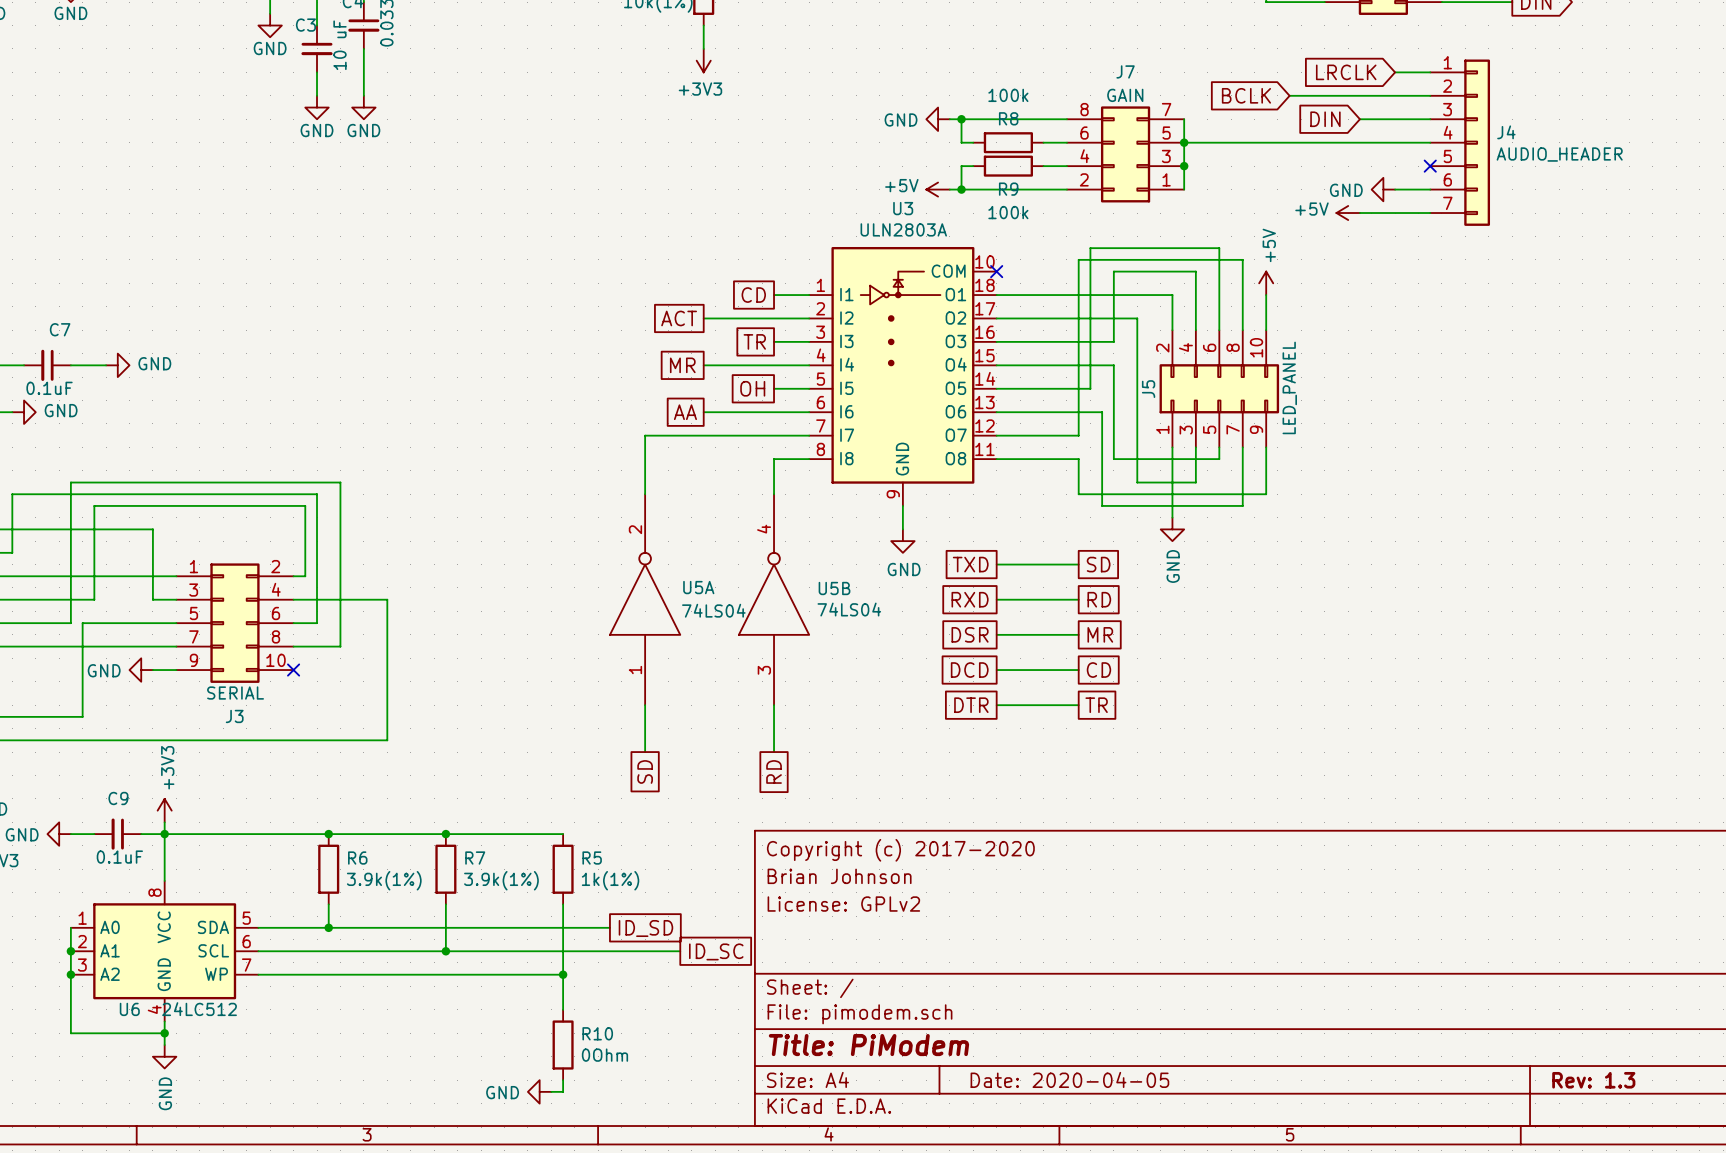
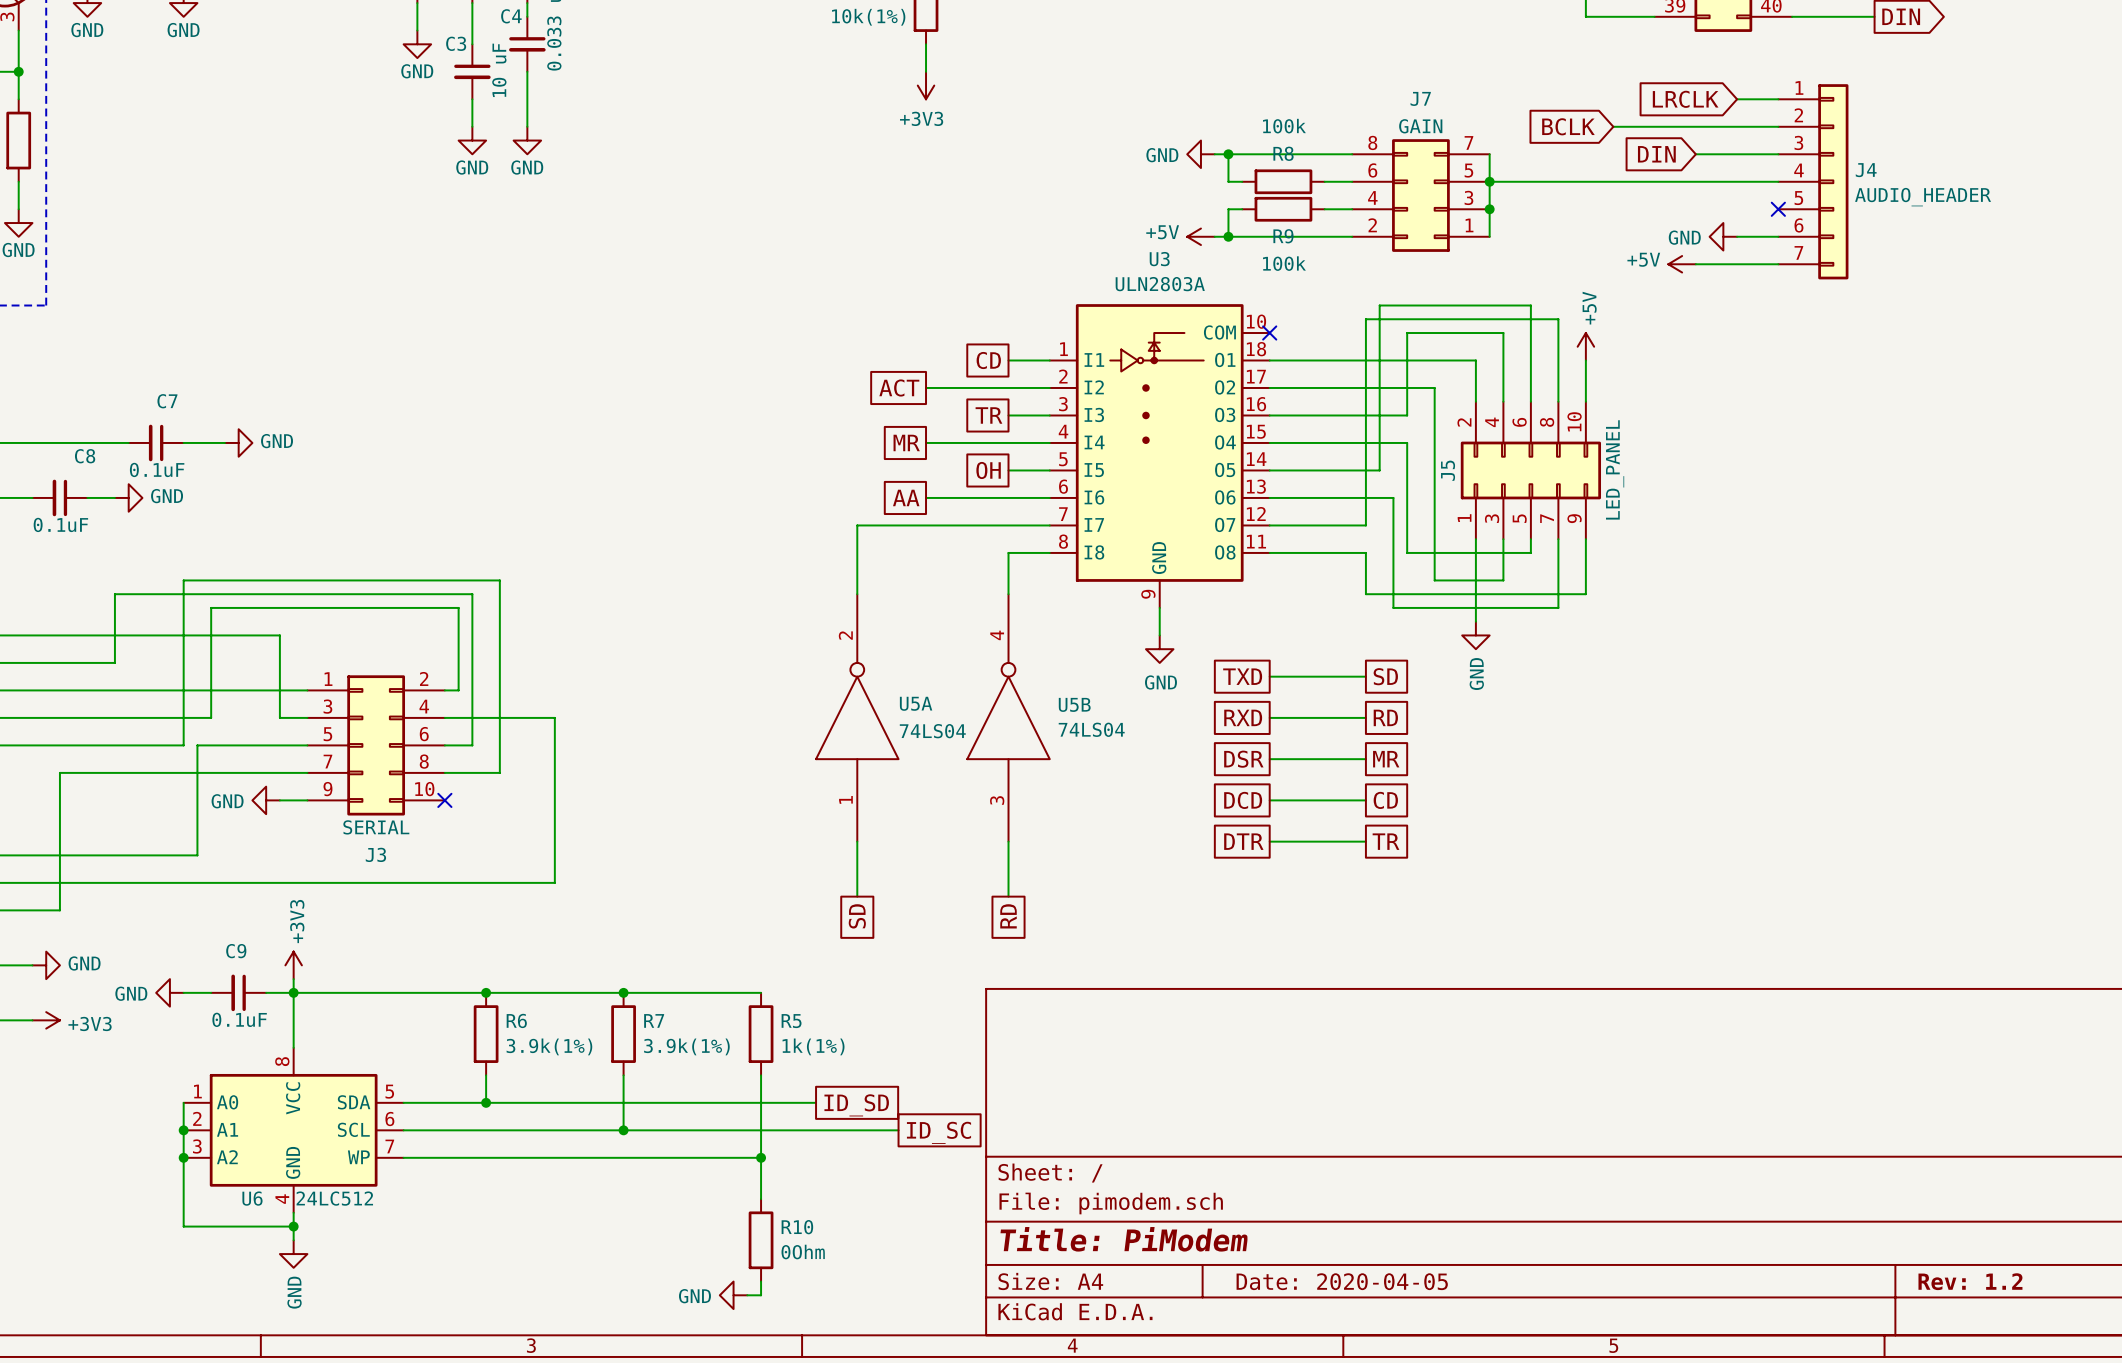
title block: Copyright (c) 2017-2020 (900, 850) -> none
title block: Brian Johnson (839, 876) -> none
title block: License: GPLv2 (843, 904) -> none
title block: Rev: 1.3 (1593, 1080) -> Rev: 1.2 (1970, 1281)

